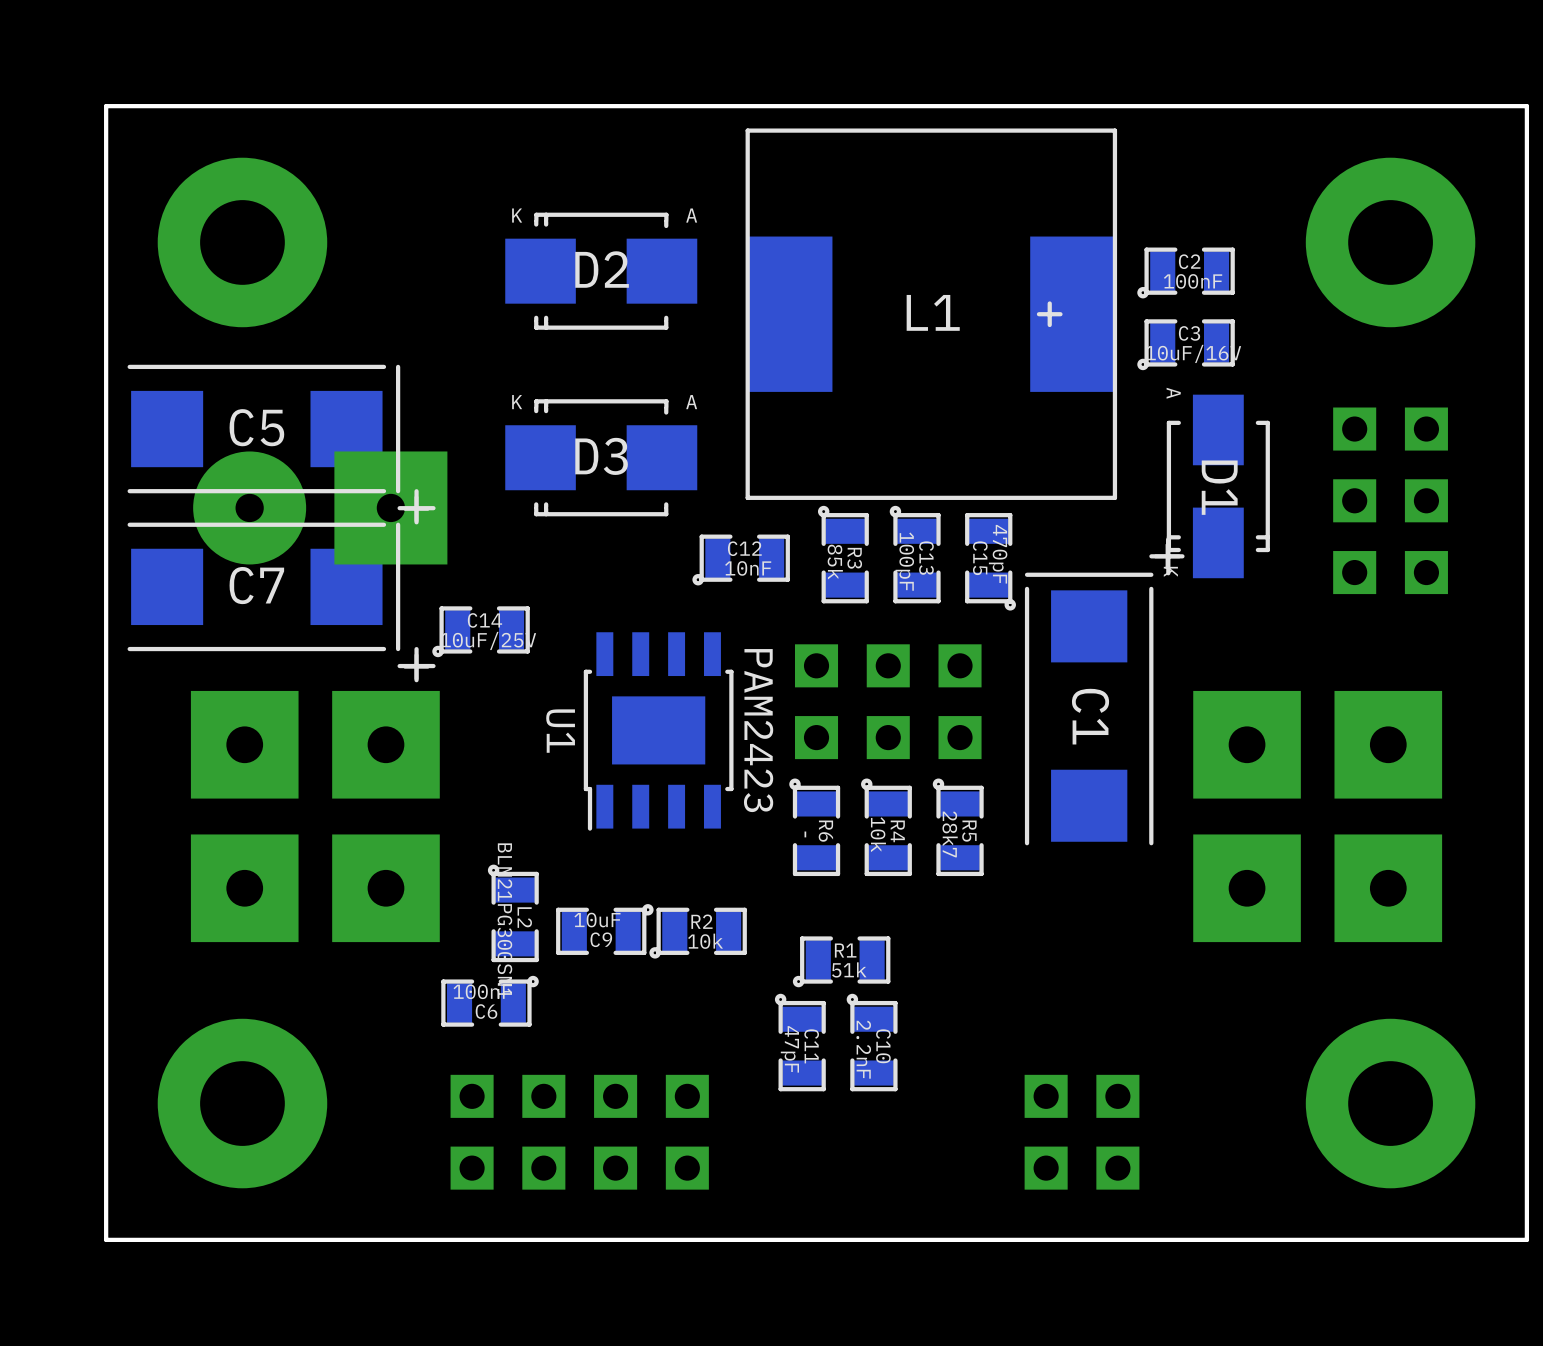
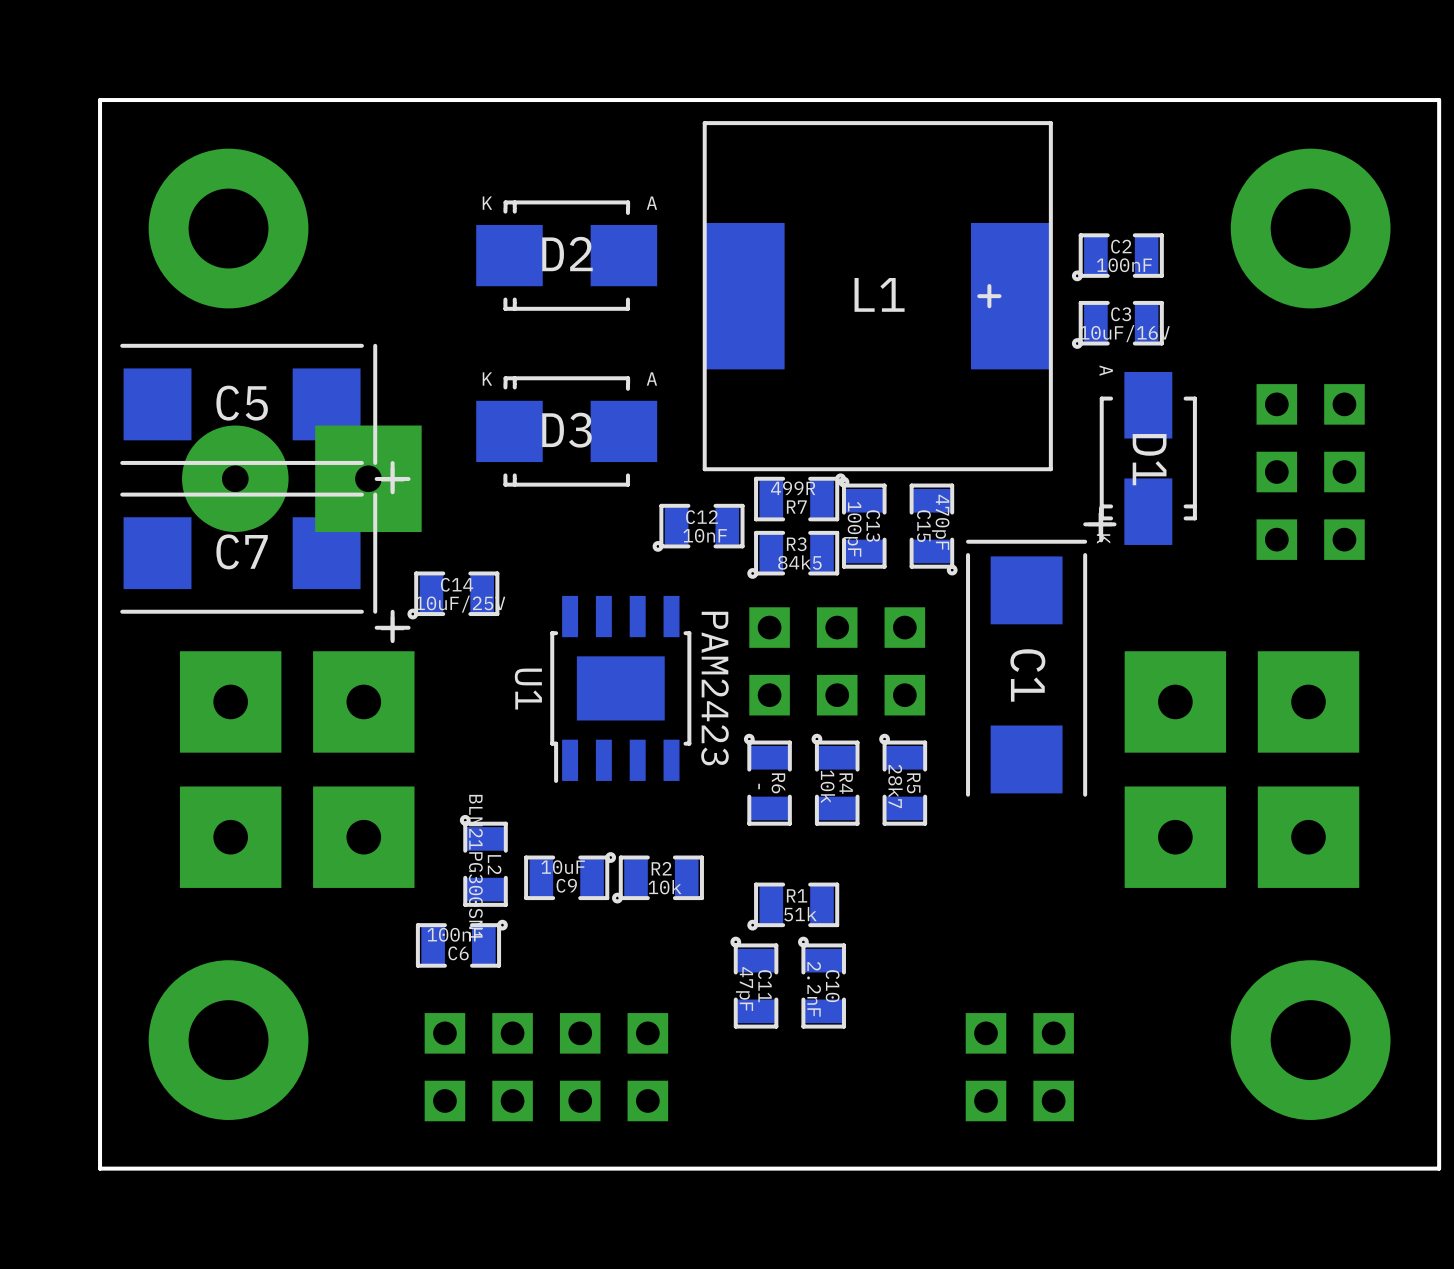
R7: none -> 499R (800, 497)
R3 rotation: 0° (843, 554) -> 90° counterclockwise (793, 554)
R3 value: 85k (835, 562) -> 84k5 (799, 562)

